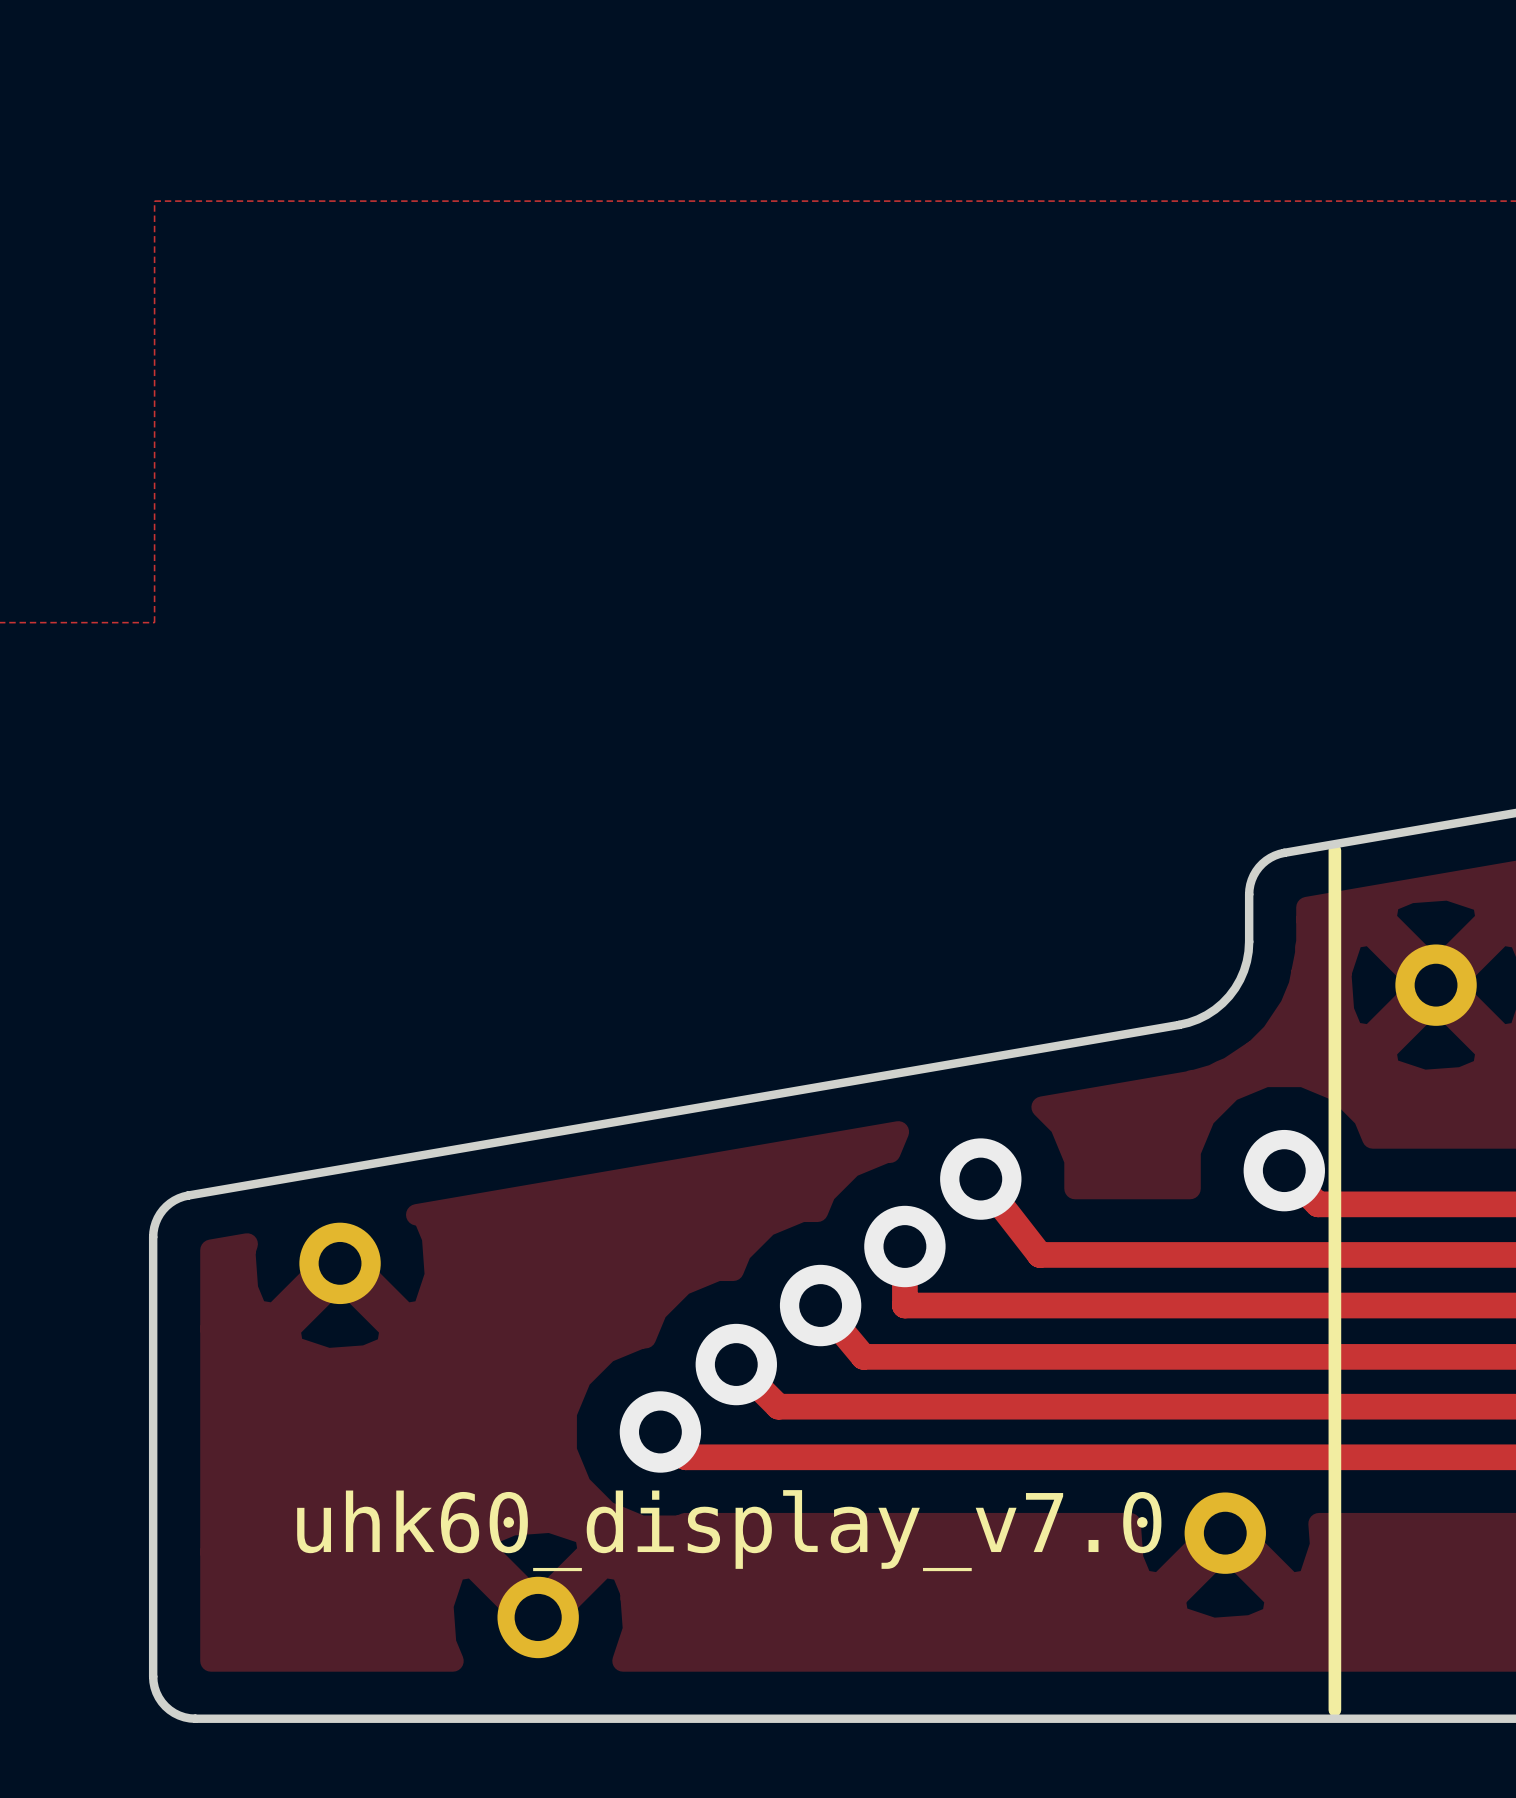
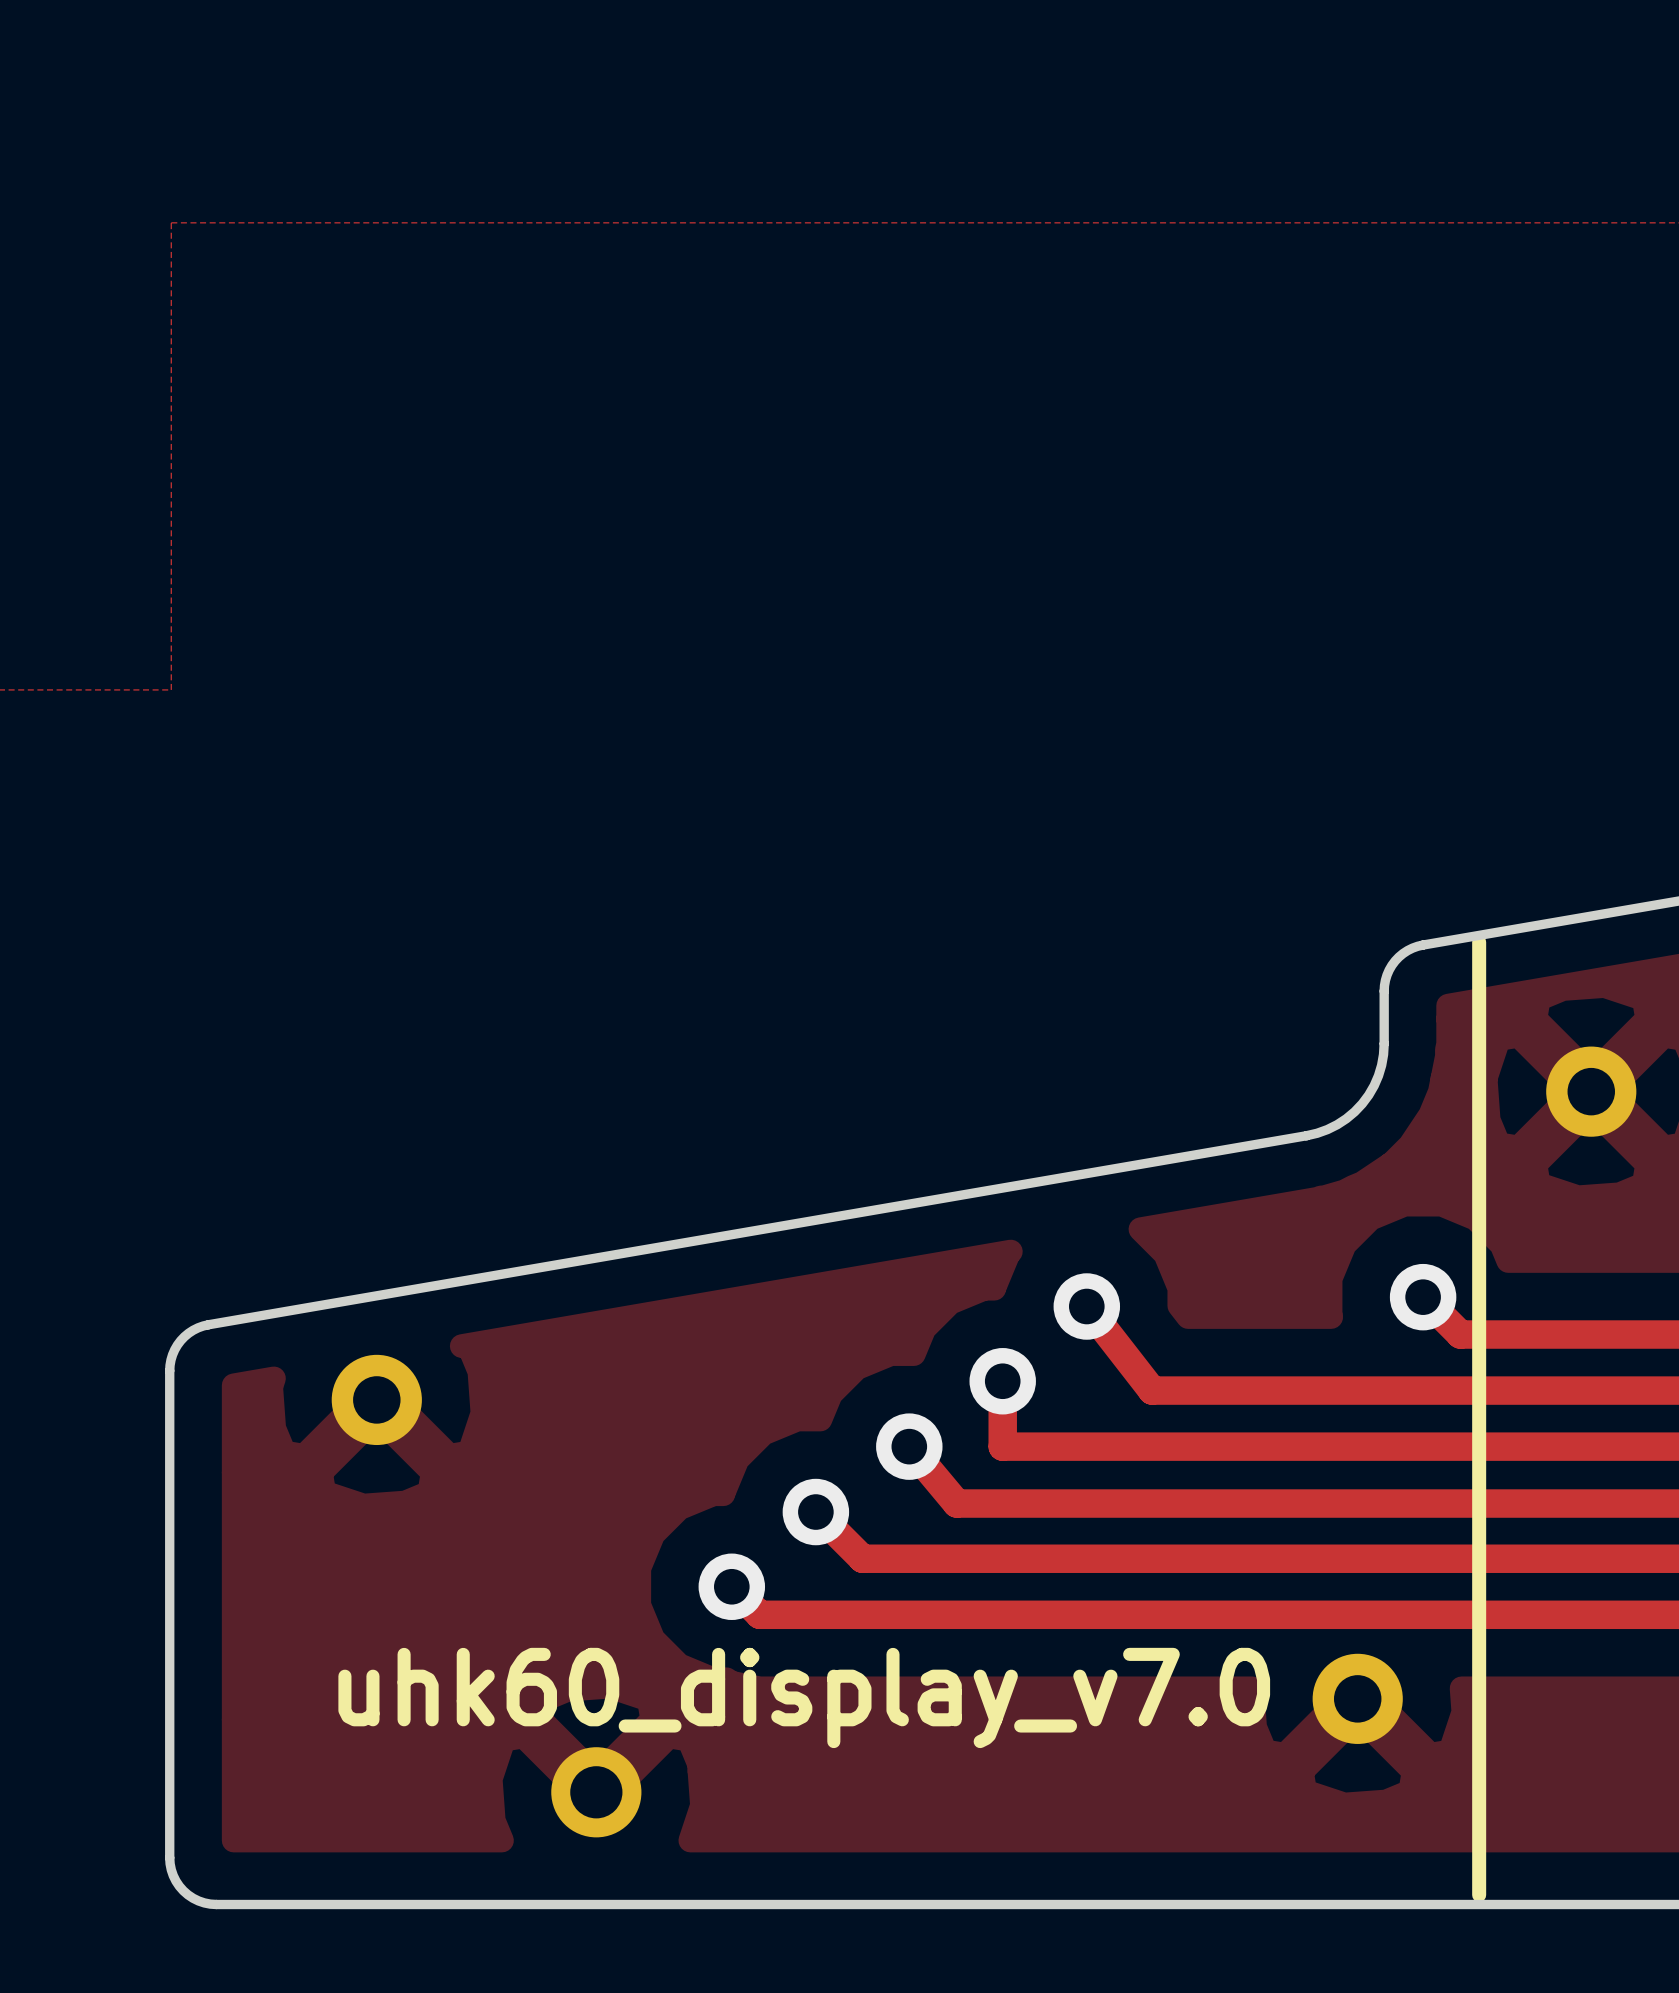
via size: [1243, 1129, 1325, 1212] -> [1389, 1263, 1457, 1331]
via size: [940, 1138, 1022, 1220] -> [1053, 1273, 1121, 1340]
via size: [864, 1205, 946, 1288] -> [969, 1348, 1036, 1415]
via size: [779, 1264, 862, 1347] -> [876, 1413, 943, 1480]
via size: [695, 1323, 777, 1406] -> [782, 1478, 850, 1546]
via size: [619, 1391, 702, 1473] -> [698, 1553, 766, 1620]

